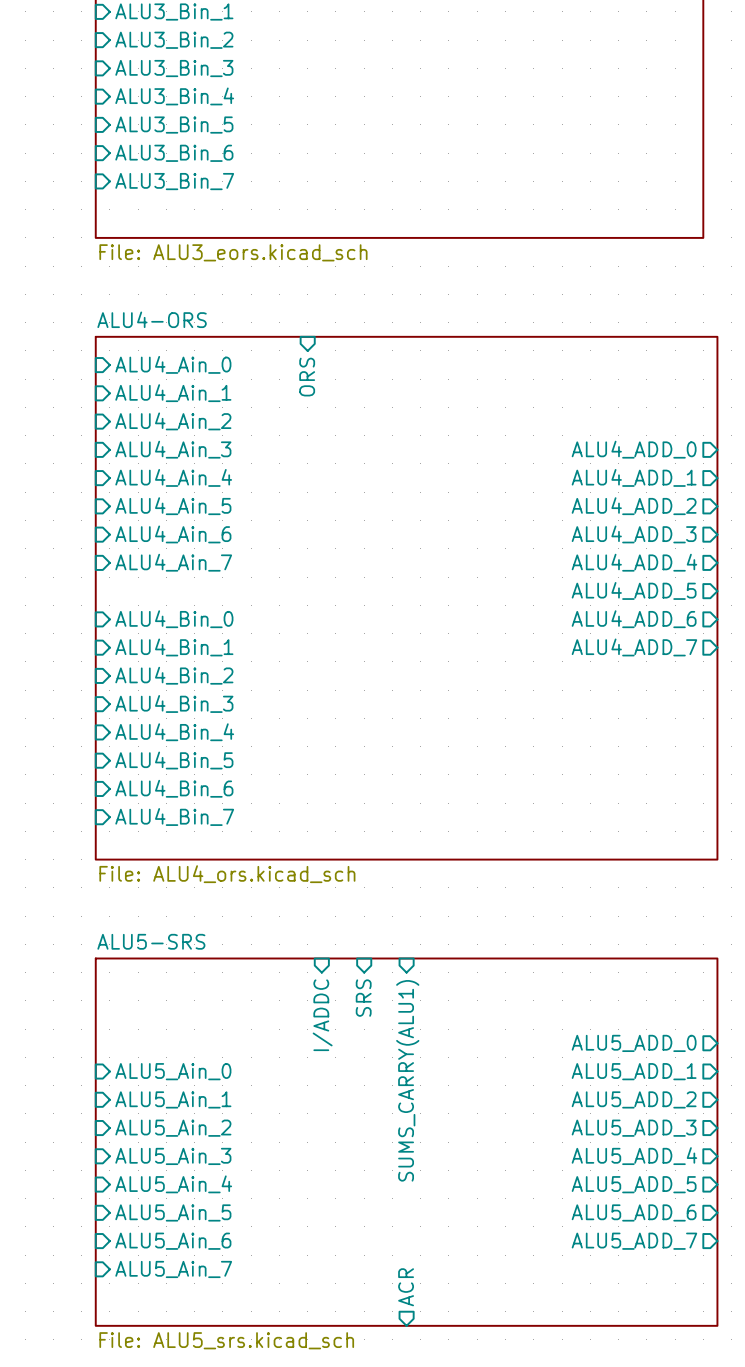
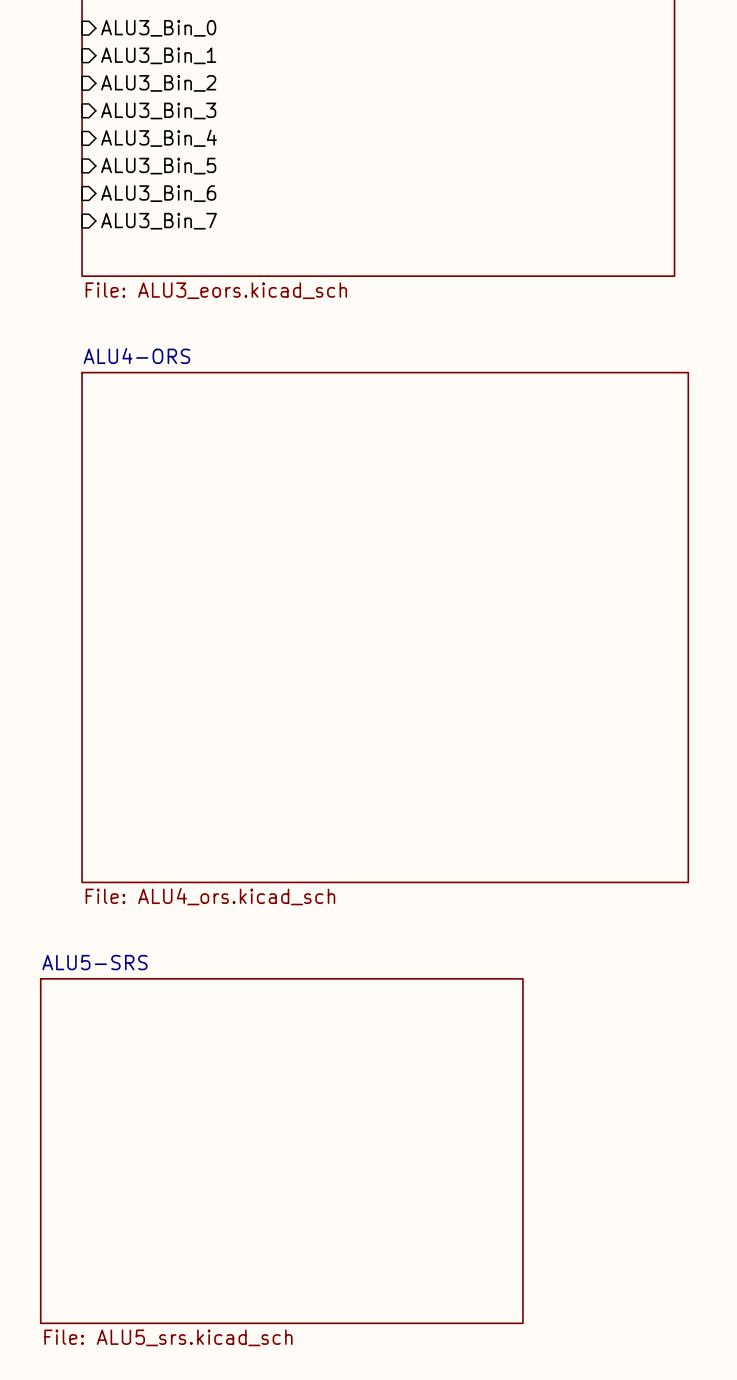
sheet pin: ALU4_Ain_0 (173, 364) -> none
sheet pin: ORS (307, 377) -> none
sheet pin: ALU4_Ain_1 (173, 393) -> none
sheet pin: ALU4_Ain_2 (173, 421) -> none
sheet pin: ALU4_Ain_3 (173, 449) -> none
sheet pin: ALU4_ADD_0 (634, 449) -> none
sheet pin: ALU4_Ain_4 (173, 477) -> none
sheet pin: ALU4_ADD_1 (634, 477) -> none
sheet pin: ALU4_Ain_5 (173, 506) -> none
sheet pin: ALU4_ADD_2 (634, 506) -> none
sheet pin: ALU4_Ain_6 (173, 534) -> none
sheet pin: ALU4_ADD_3 (634, 534) -> none
sheet pin: ALU4_Ain_7 (173, 562) -> none
sheet pin: ALU4_ADD_4 (634, 562) -> none
sheet pin: ALU4_ADD_5 (634, 590) -> none
sheet pin: ALU4_Bin_0 (174, 619) -> none
sheet pin: ALU4_ADD_6 (634, 619) -> none
sheet pin: ALU4_Bin_1 (174, 647) -> none
sheet pin: ALU4_ADD_7 (634, 647) -> none
sheet pin: ALU4_Bin_2 (174, 675) -> none
sheet pin: ALU4_Bin_3 (174, 703) -> none
sheet pin: ALU4_Bin_4 (174, 732) -> none
sheet pin: ALU4_Bin_5 (174, 760) -> none
sheet pin: ALU4_Bin_6 (174, 788) -> none
sheet pin: ALU4_Bin_7 (174, 817) -> none
sheet ALU5-SRS name position: ALU5-SRS (151, 941) -> ALU5-SRS (94, 962)
sheet ALU5-SRS shape: [94, 957, 719, 1327] -> [39, 978, 524, 1325]
sheet pin: SRS (363, 998) -> none
sheet pin: I/ADDC (322, 1015) -> none
sheet pin: ALU5_ADD_0 (634, 1043) -> none
sheet pin: ALU5_Ain_0 (173, 1071) -> none
sheet pin: ALU5_ADD_1 (634, 1071) -> none
sheet pin: SUMS_CARRY(ALU1) (407, 1080) -> none
sheet pin: ALU5_Ain_1 (173, 1099) -> none
sheet pin: ALU5_ADD_2 (634, 1099) -> none
sheet pin: ALU5_Ain_2 (173, 1128) -> none
sheet pin: ALU5_ADD_3 (634, 1128) -> none
sheet pin: ALU5_Ain_3 (173, 1156) -> none
sheet pin: ALU5_ADD_4 (634, 1156) -> none
sheet pin: ALU5_Ain_4 (173, 1184) -> none
sheet pin: ALU5_ADD_5 (634, 1184) -> none
sheet pin: ALU5_Ain_5 (173, 1212) -> none
sheet pin: ALU5_ADD_6 (634, 1212) -> none
sheet pin: ALU5_Ain_6 (173, 1241) -> none
sheet pin: ALU5_ADD_7 (634, 1241) -> none
sheet pin: ALU5_Ain_7 (173, 1269) -> none
sheet pin: ACR (406, 1287) -> none
sheet ALU5-SRS value position: File: ALU5_srs.kicad_sch (226, 1340) -> File: ALU5_srs.kicad_sch (168, 1337)

